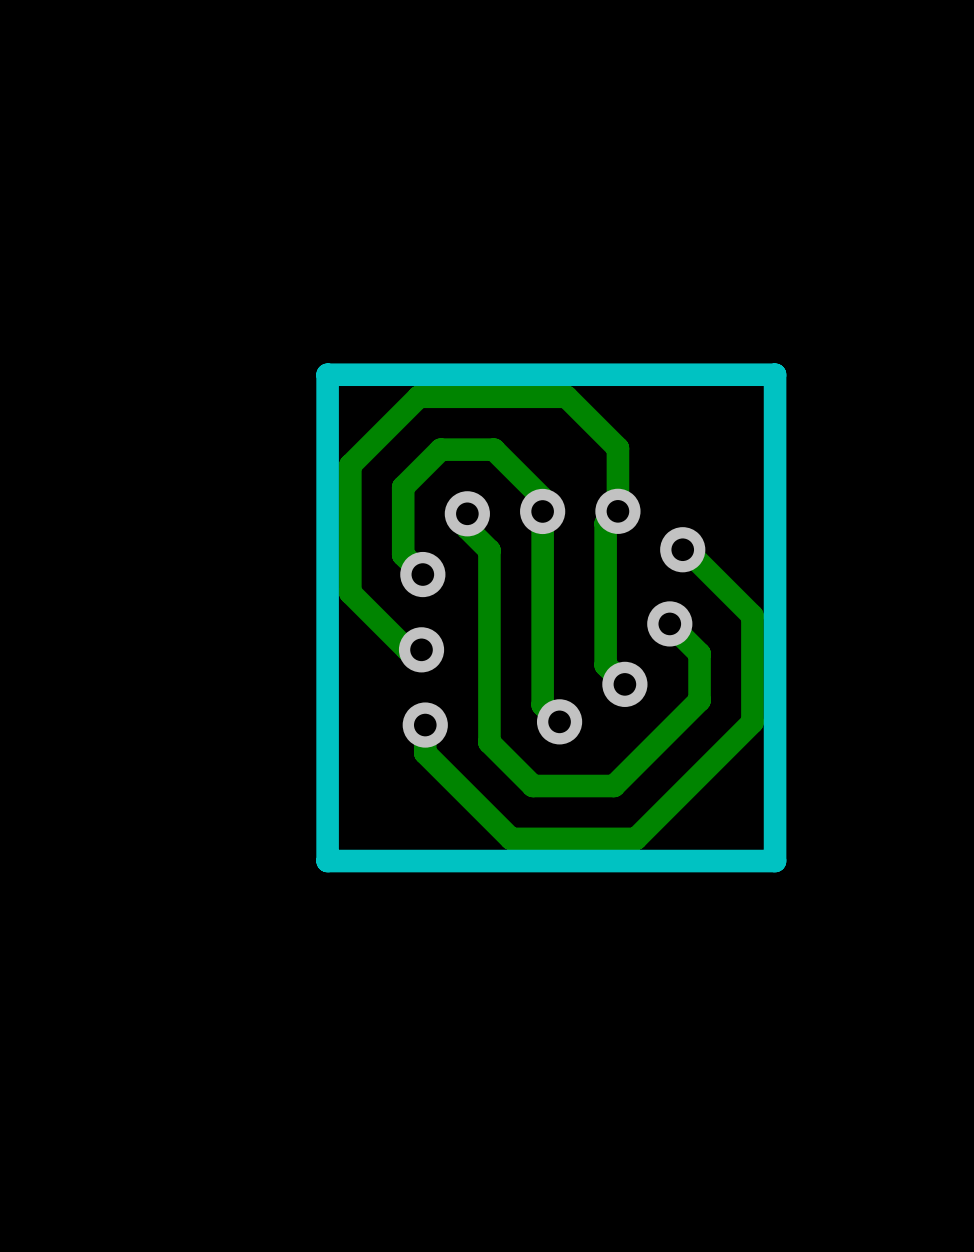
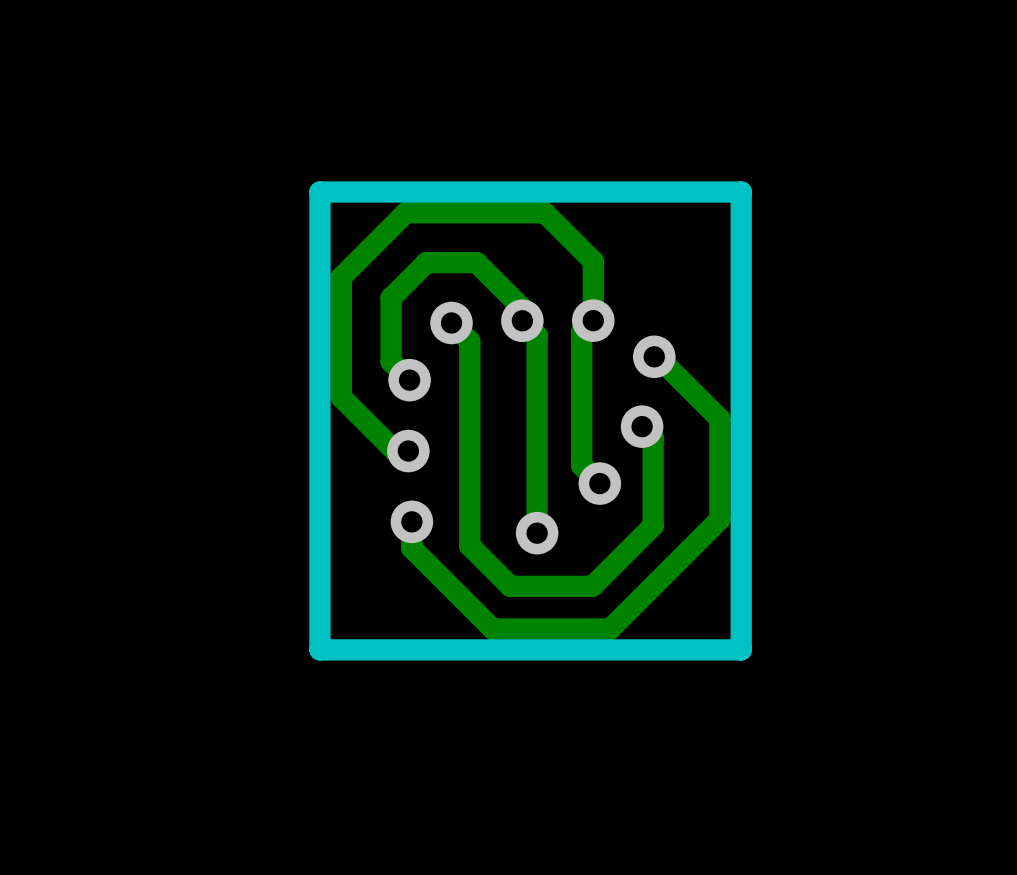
bottom track: (542, 511) (542, 704) (559, 721) -> (522, 320) (537, 335) (537, 533)
bottom track: (467, 513) (467, 528) (489, 550) (489, 742) (532, 786) (614, 786) (699, 700) (699, 653) (681, 635) -> (451, 322) (469, 341) (469, 545) (510, 586) (592, 586) (653, 525) (653, 437)
via position: (559, 721) -> (537, 533)

